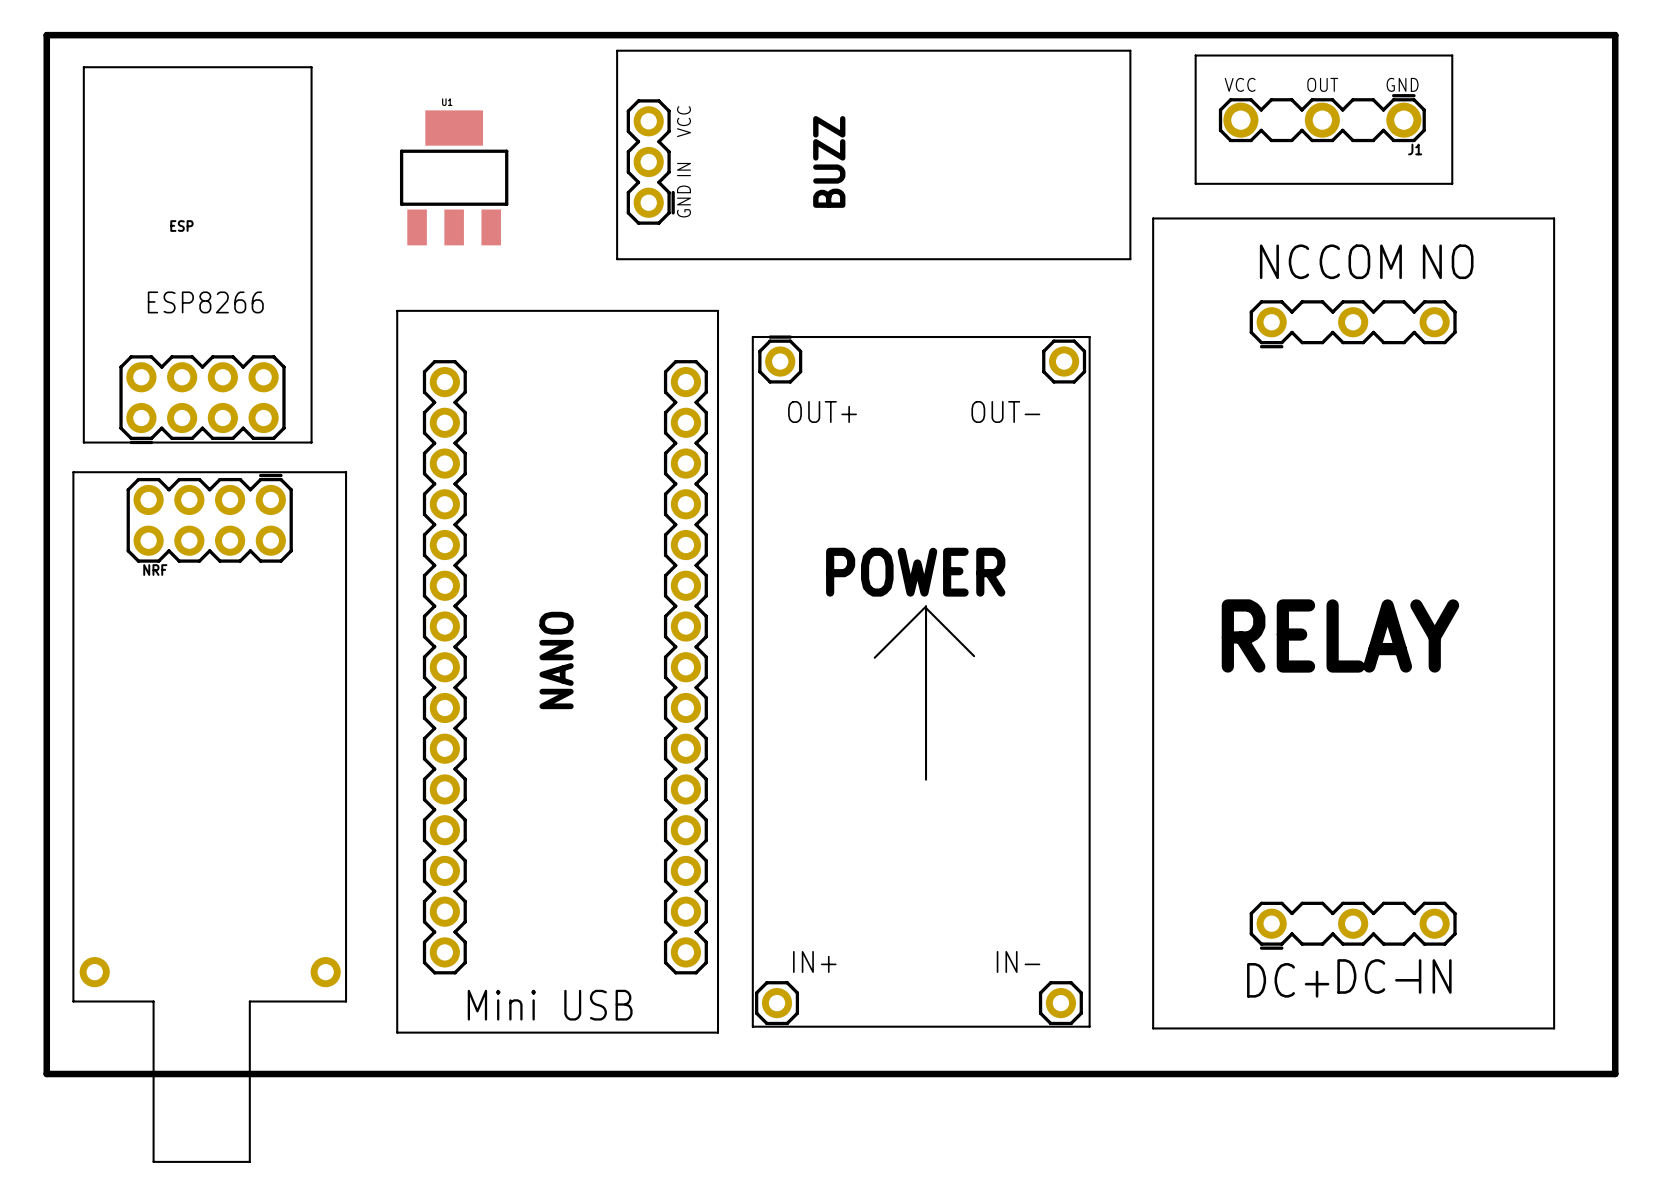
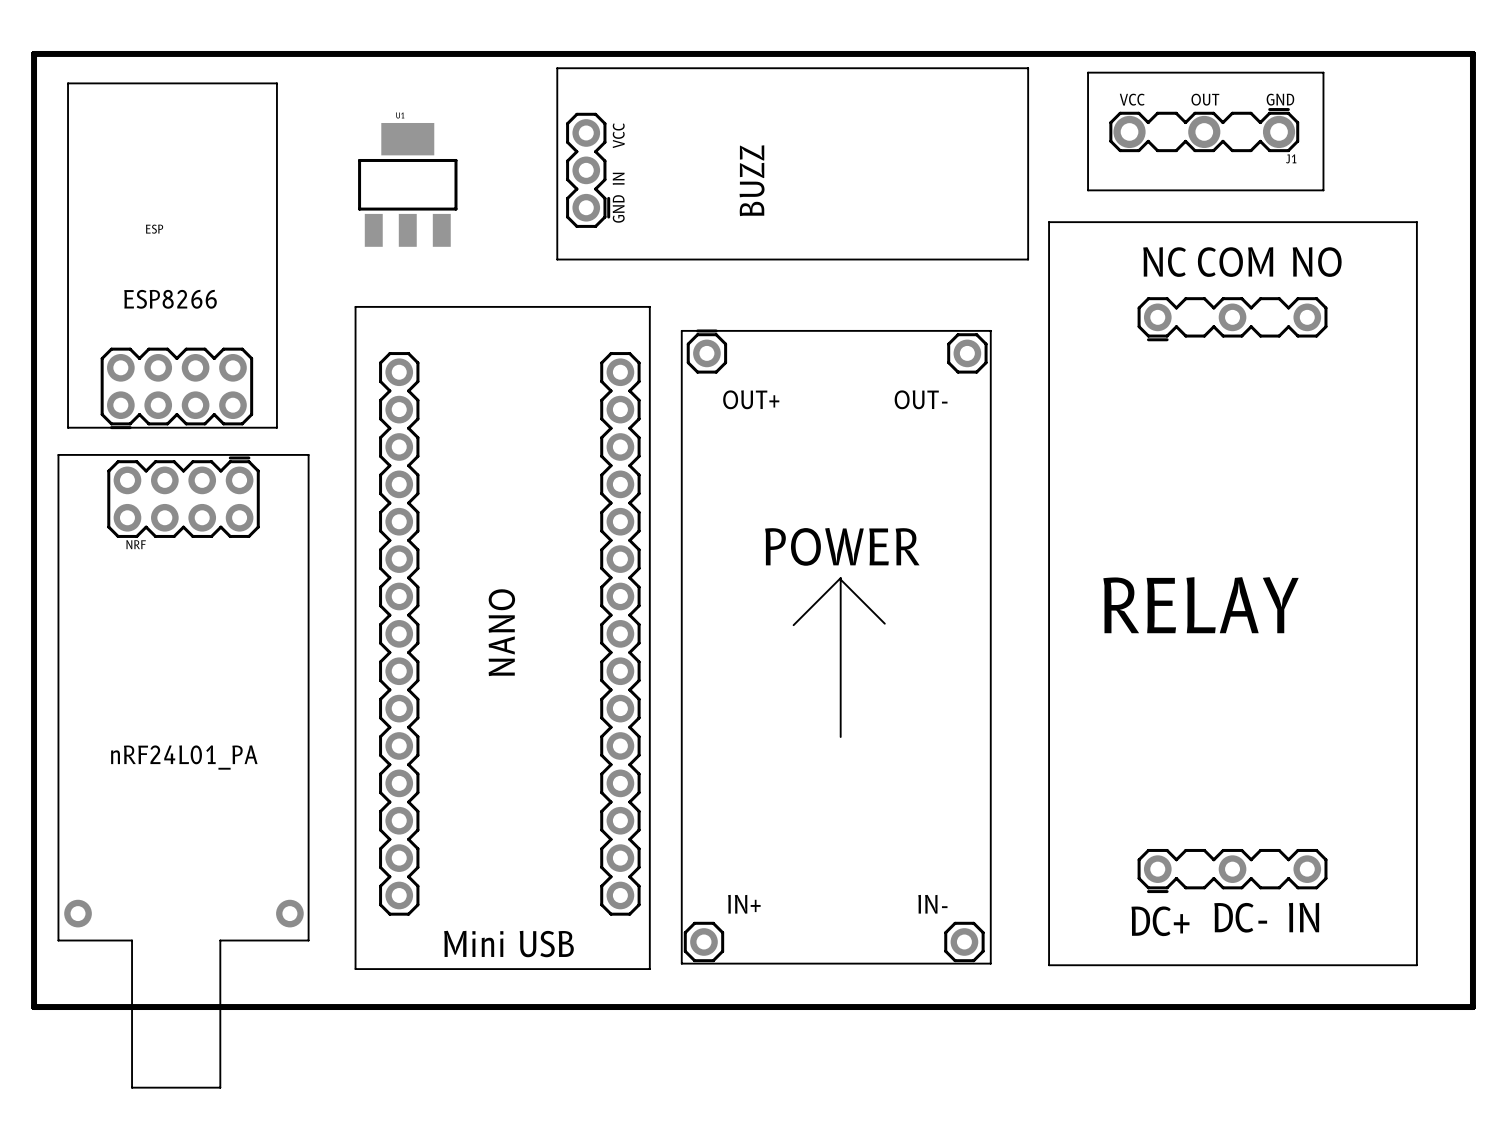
NRF text: none -> nRF24L01_PA (184, 757)

